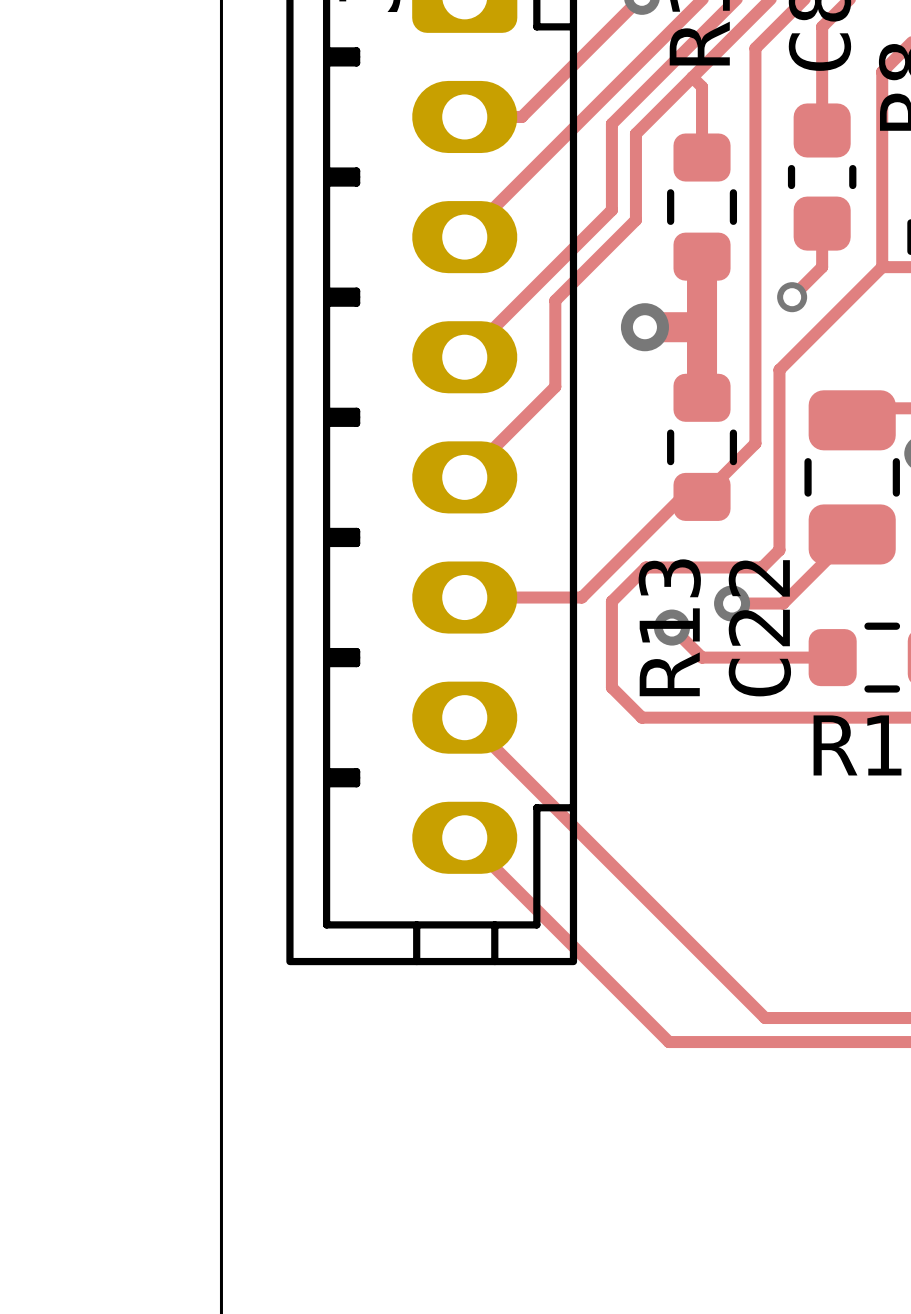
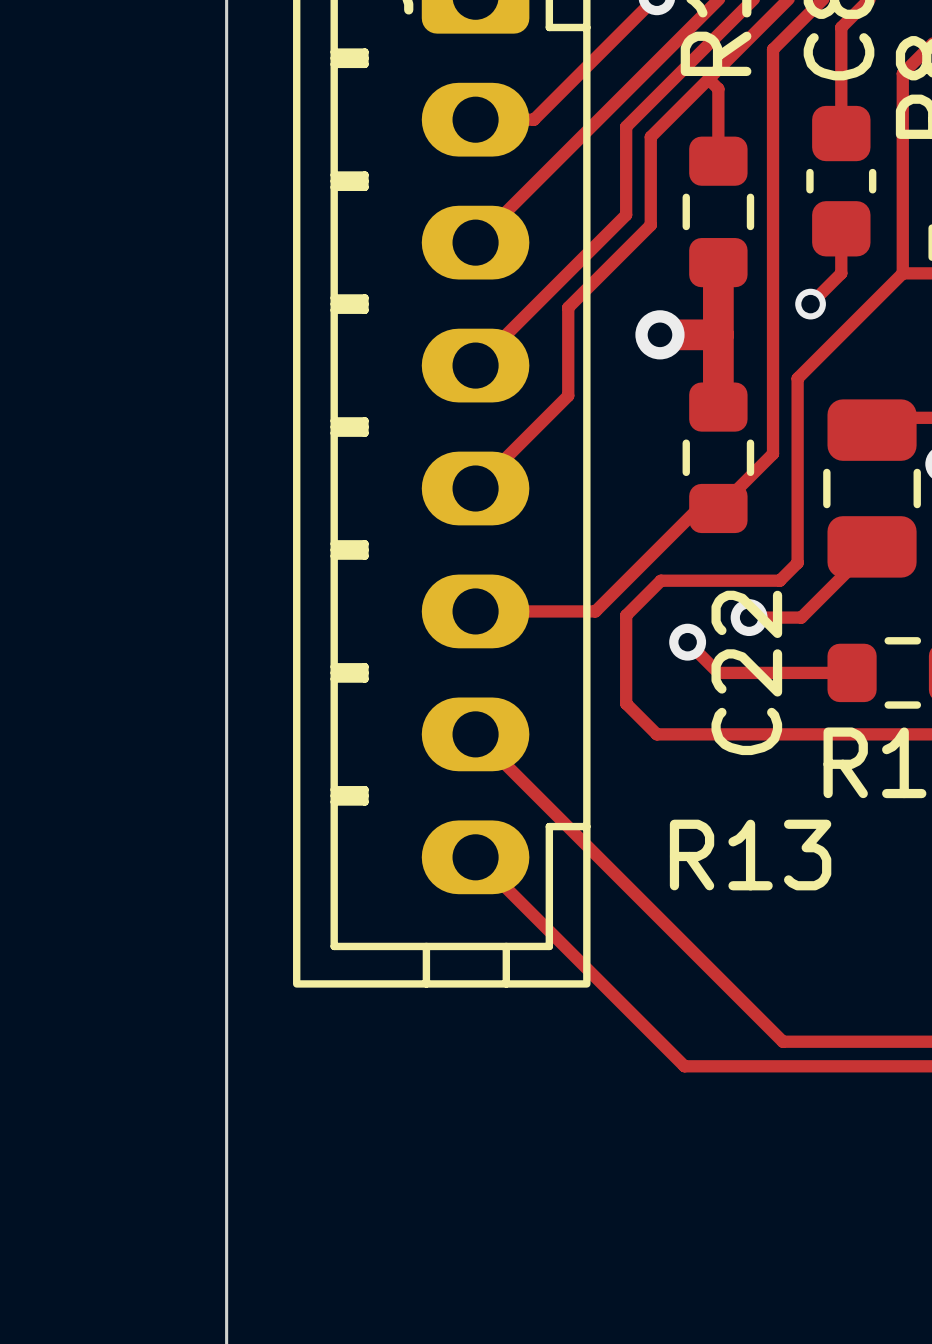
R13 name rotation: 0° (669, 627) -> 90° clockwise (750, 855)
R13 name position: R13 (669, 627) -> R13 (750, 855)
C22 name position: C22 (759, 628) -> C22 (746, 672)

